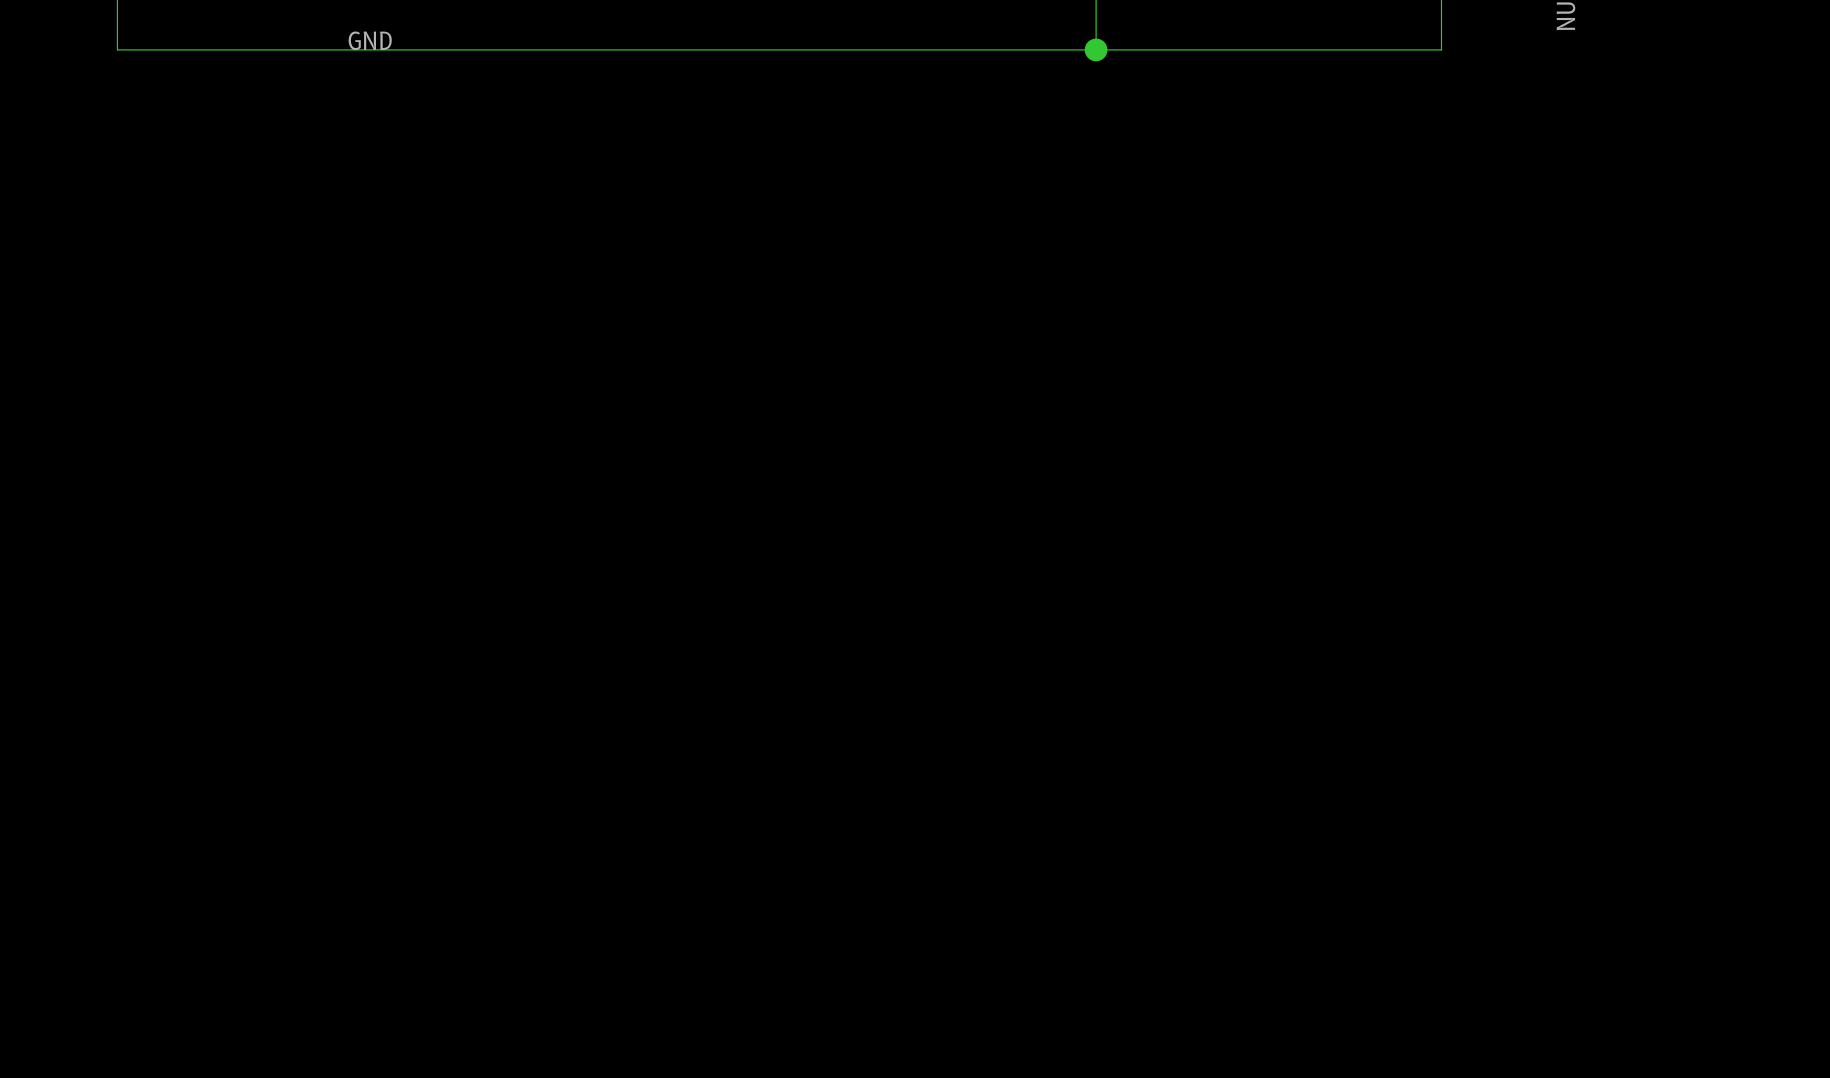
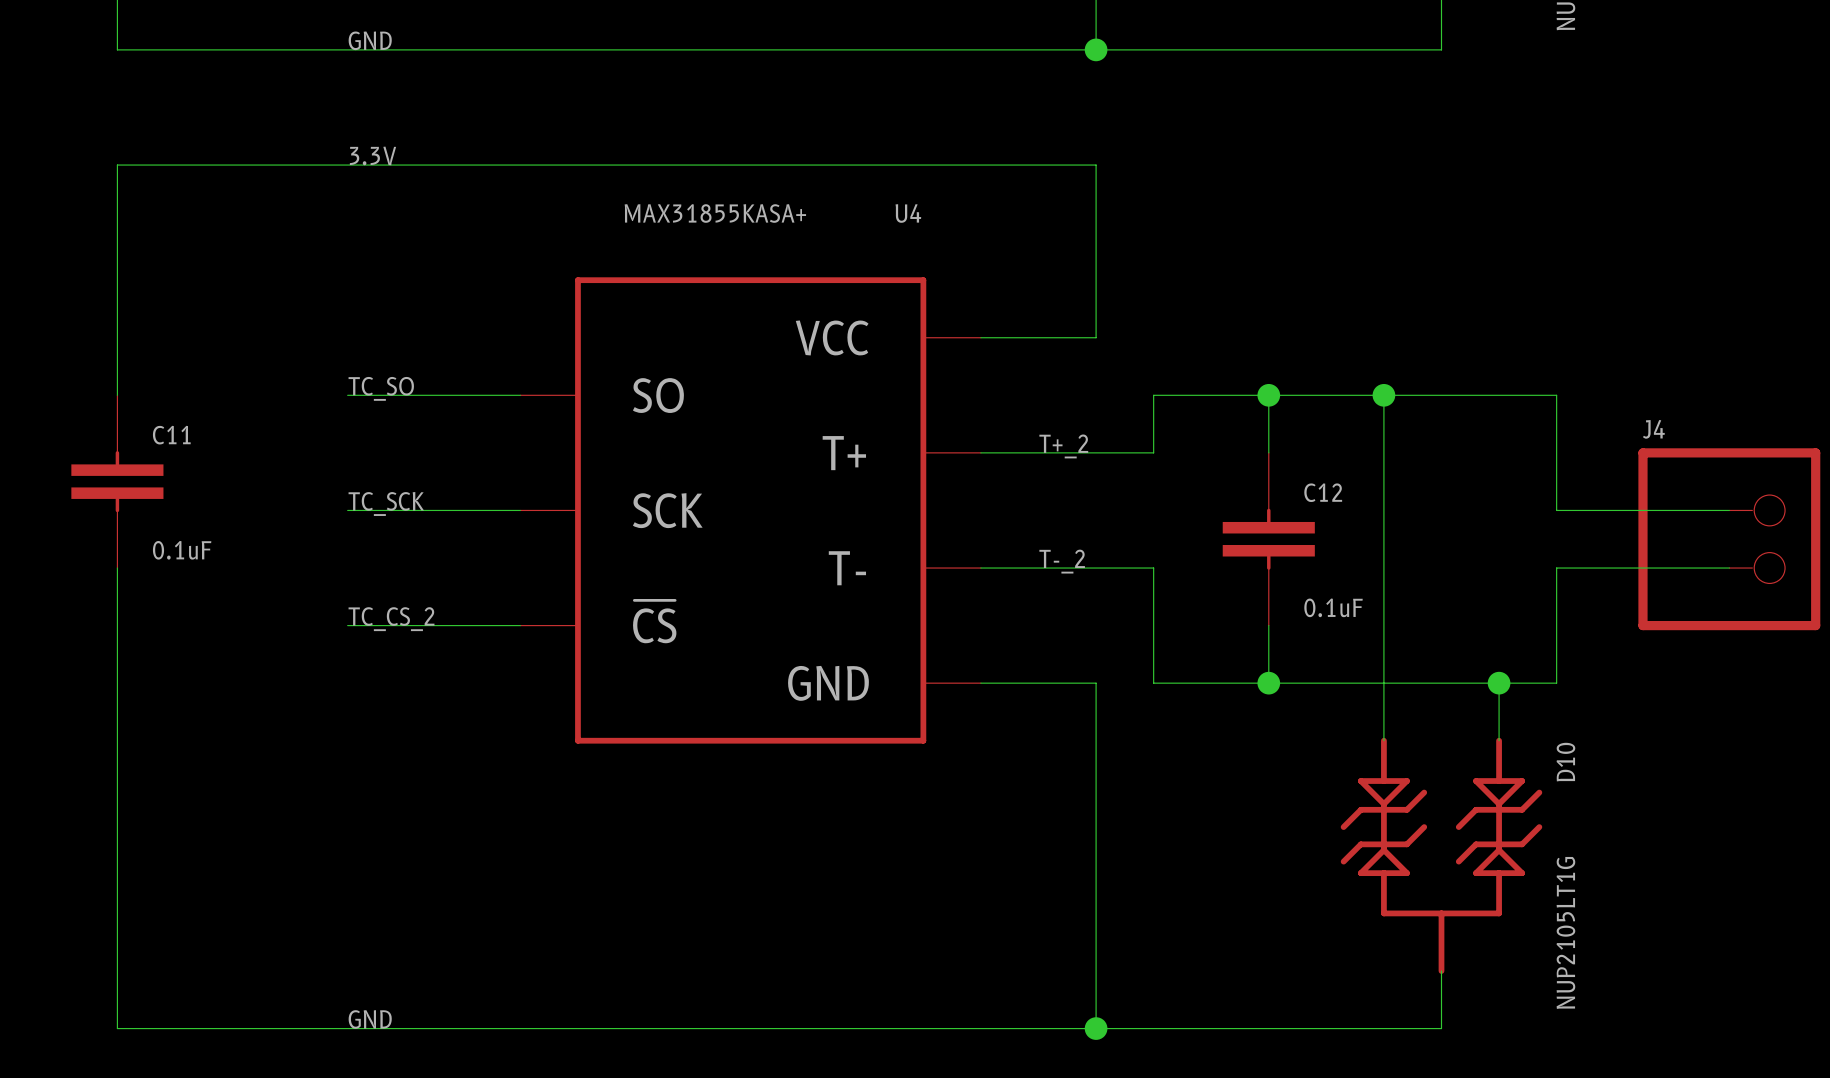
label: none -> 3.3V (372, 155)
wire: none -> (980, 337) (1096, 337) (1096, 165) (117, 165) (117, 395)
label: none -> TC_SO (381, 388)
wire: none -> (347, 395) (520, 395)
wire: none -> (1268, 395) (1268, 452)
junction: none -> (1268, 395)
wire: none -> (1383, 395) (1383, 740)
junction: none -> (1383, 395)
label: none -> T+_2 (1063, 446)
wire: none -> (980, 452) (1153, 452) (1153, 395) (1556, 395) (1556, 510) (1729, 510)
C11: none -> 0.1uF (117, 481)
label: none -> TC_SCK (386, 504)
wire: none -> (347, 510) (520, 510)
U4: none -> MAX31855KASA+ (750, 510)
C12: none -> 0.1uF (1268, 539)
J4: none -> (1729, 539)
label: none -> T-_2 (1062, 561)
wire: none -> (117, 568) (117, 1028) (1441, 1028) (1441, 971)
wire: none -> (980, 568) (1153, 568) (1153, 683) (1556, 683) (1556, 568) (1729, 568)
label: none -> TC_CS_2 (391, 619)
wire: none -> (347, 625) (520, 625)
wire: none -> (1268, 625) (1268, 683)
wire: none -> (980, 683) (1096, 683) (1096, 1028)
junction: none -> (1268, 683)
wire: none -> (1499, 683) (1499, 740)
junction: none -> (1499, 683)
D10: none -> NUP2105LT1G (1441, 855)
label: none -> GND (370, 1019)
junction: none -> (1096, 1028)

